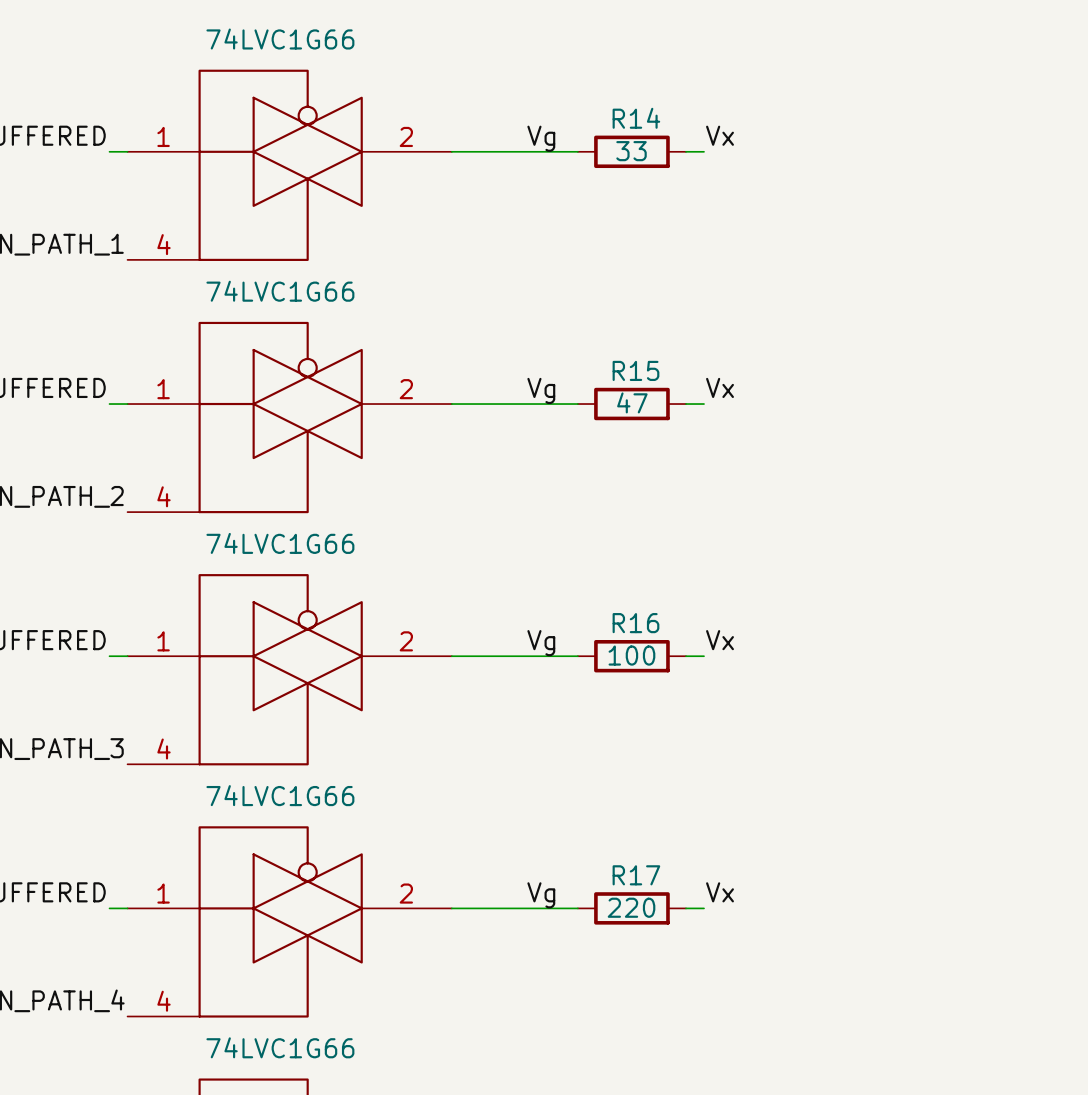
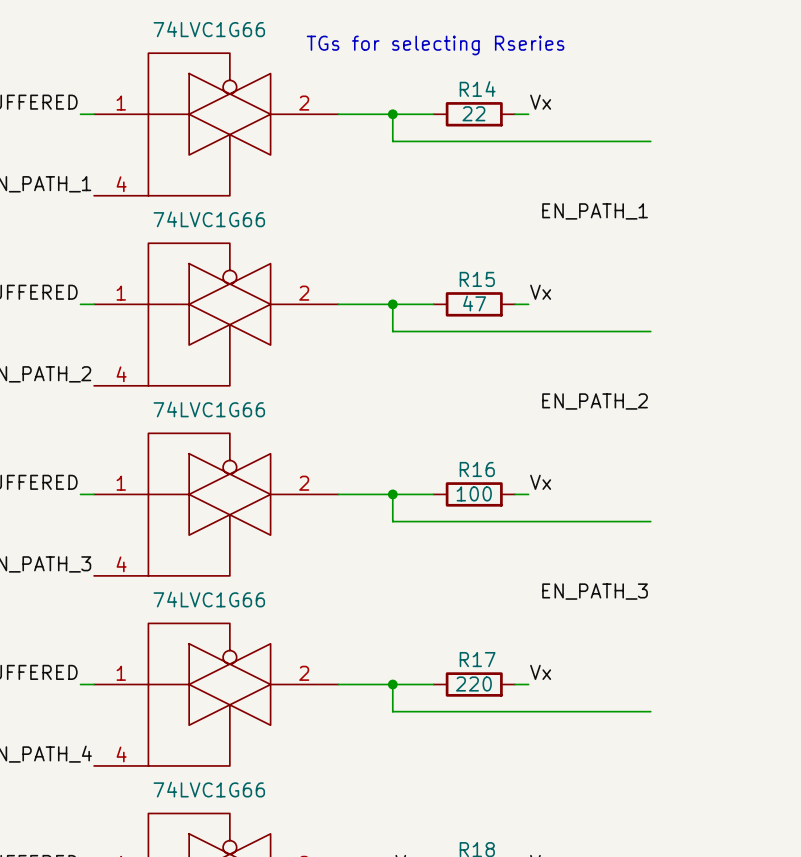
text: none -> TGs for selecting Rseries (435, 45)
label: Vg (541, 138) -> none
wire: none -> (392, 114) (392, 141) (650, 141)
junction: none -> (392, 114)
R14 value: 33 (631, 151) -> 22 (473, 113)
label: none -> EN_PATH_1 (595, 211)
label: Vg (541, 390) -> none
wire: none -> (392, 304) (392, 331) (650, 331)
junction: none -> (392, 304)
label: none -> EN_PATH_2 (595, 401)
label: Vg (541, 643) -> none
wire: none -> (392, 494) (392, 521) (650, 521)
junction: none -> (392, 494)
label: none -> EN_PATH_3 (595, 591)
label: Vg (541, 895) -> none
wire: none -> (392, 684) (392, 711) (650, 711)
junction: none -> (392, 684)

